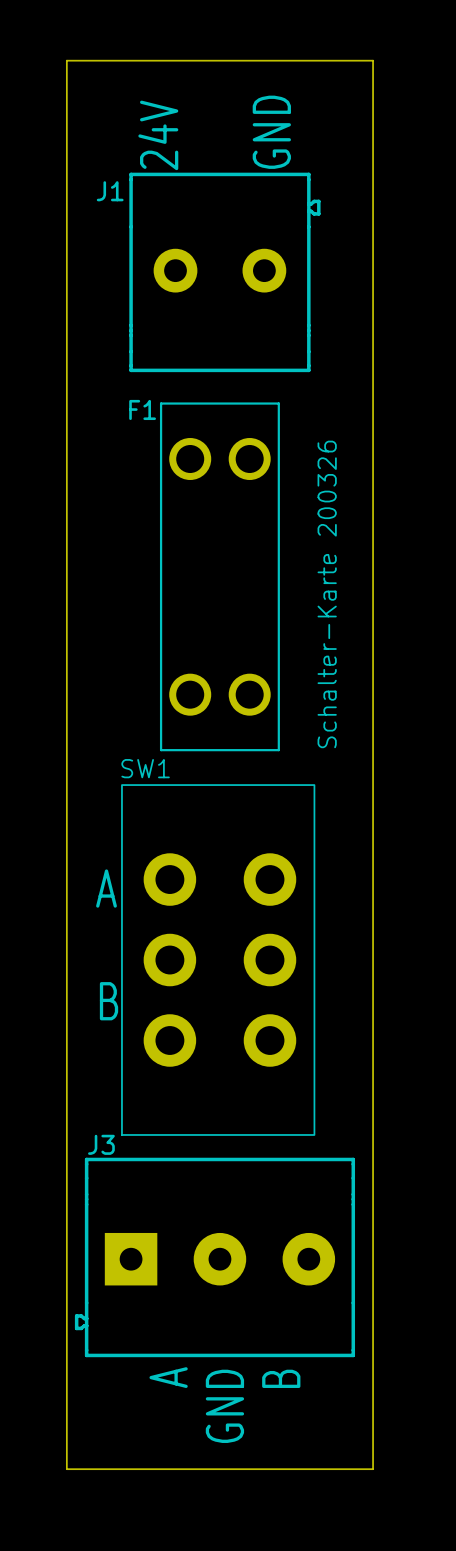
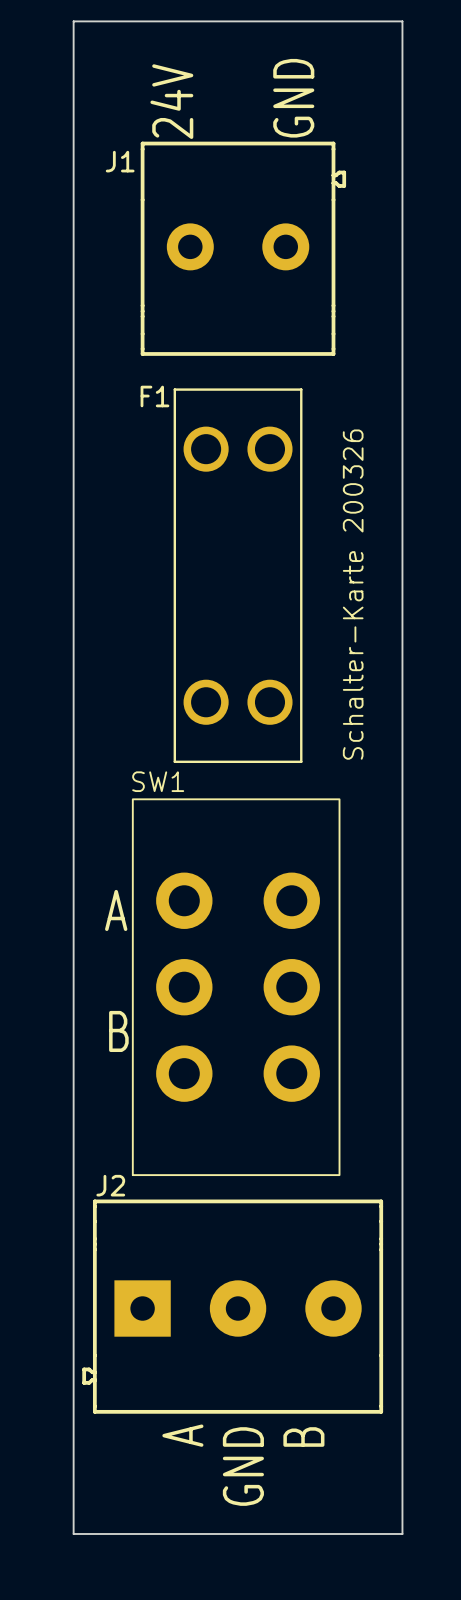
J3 name: J3 (101, 1144) -> J2 (110, 1185)

